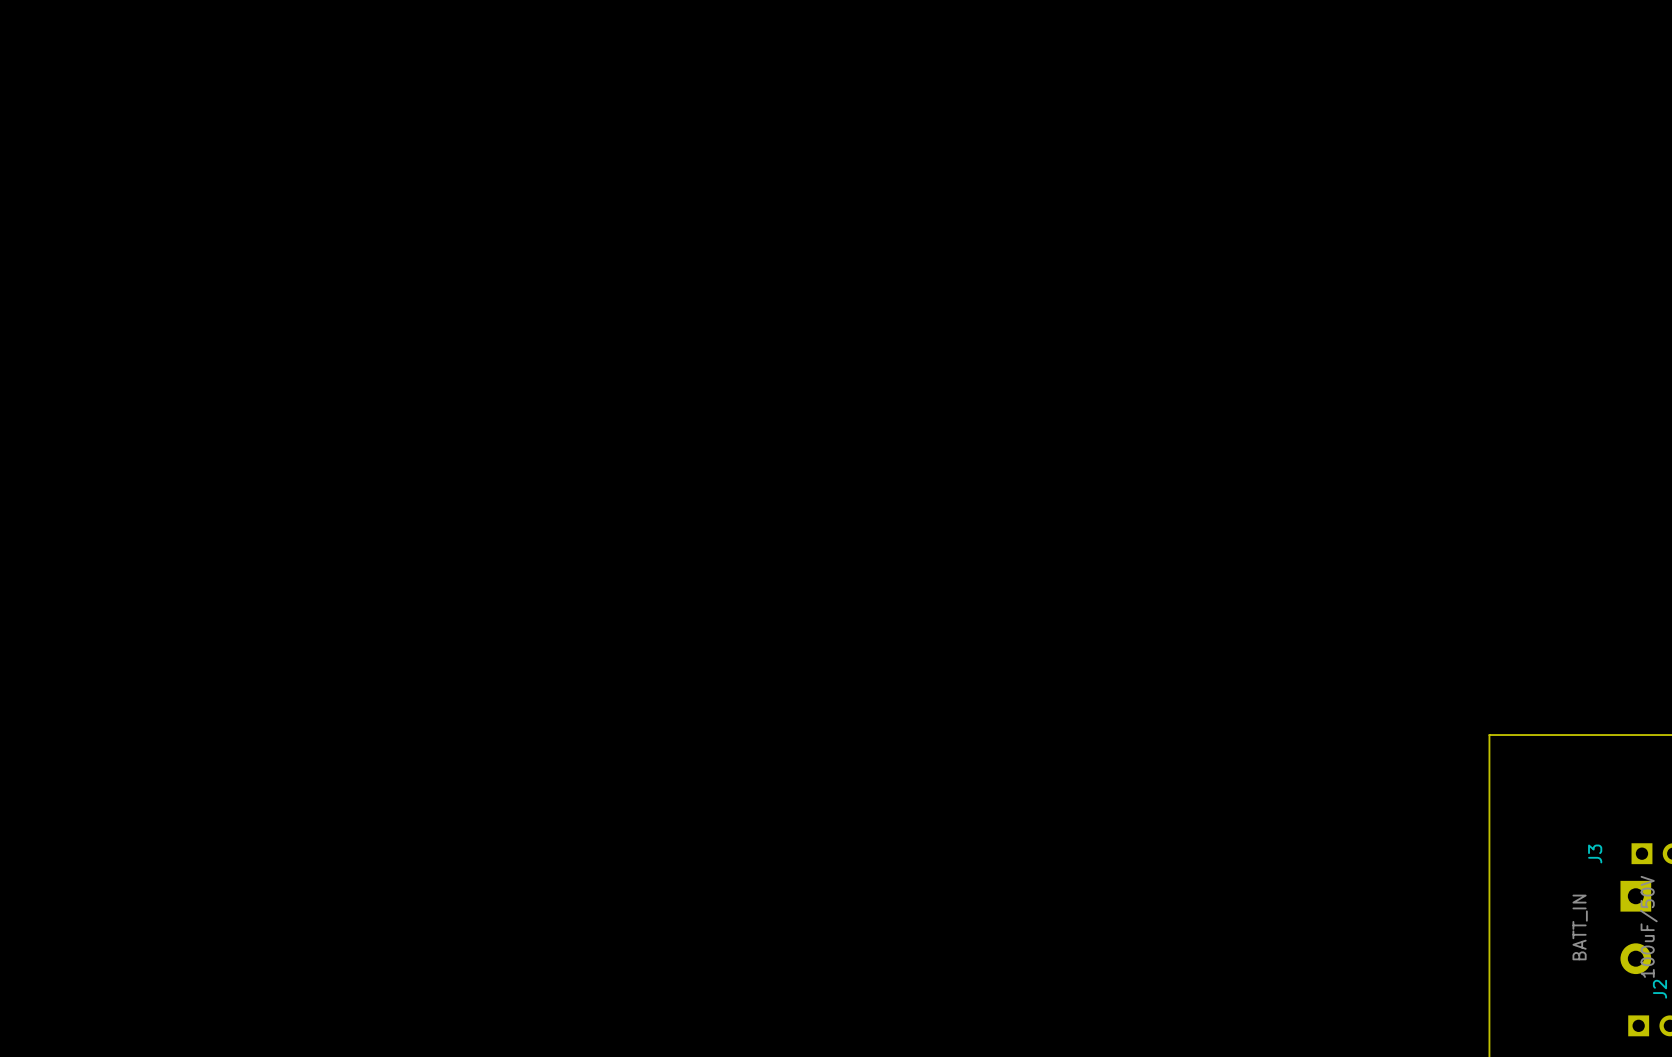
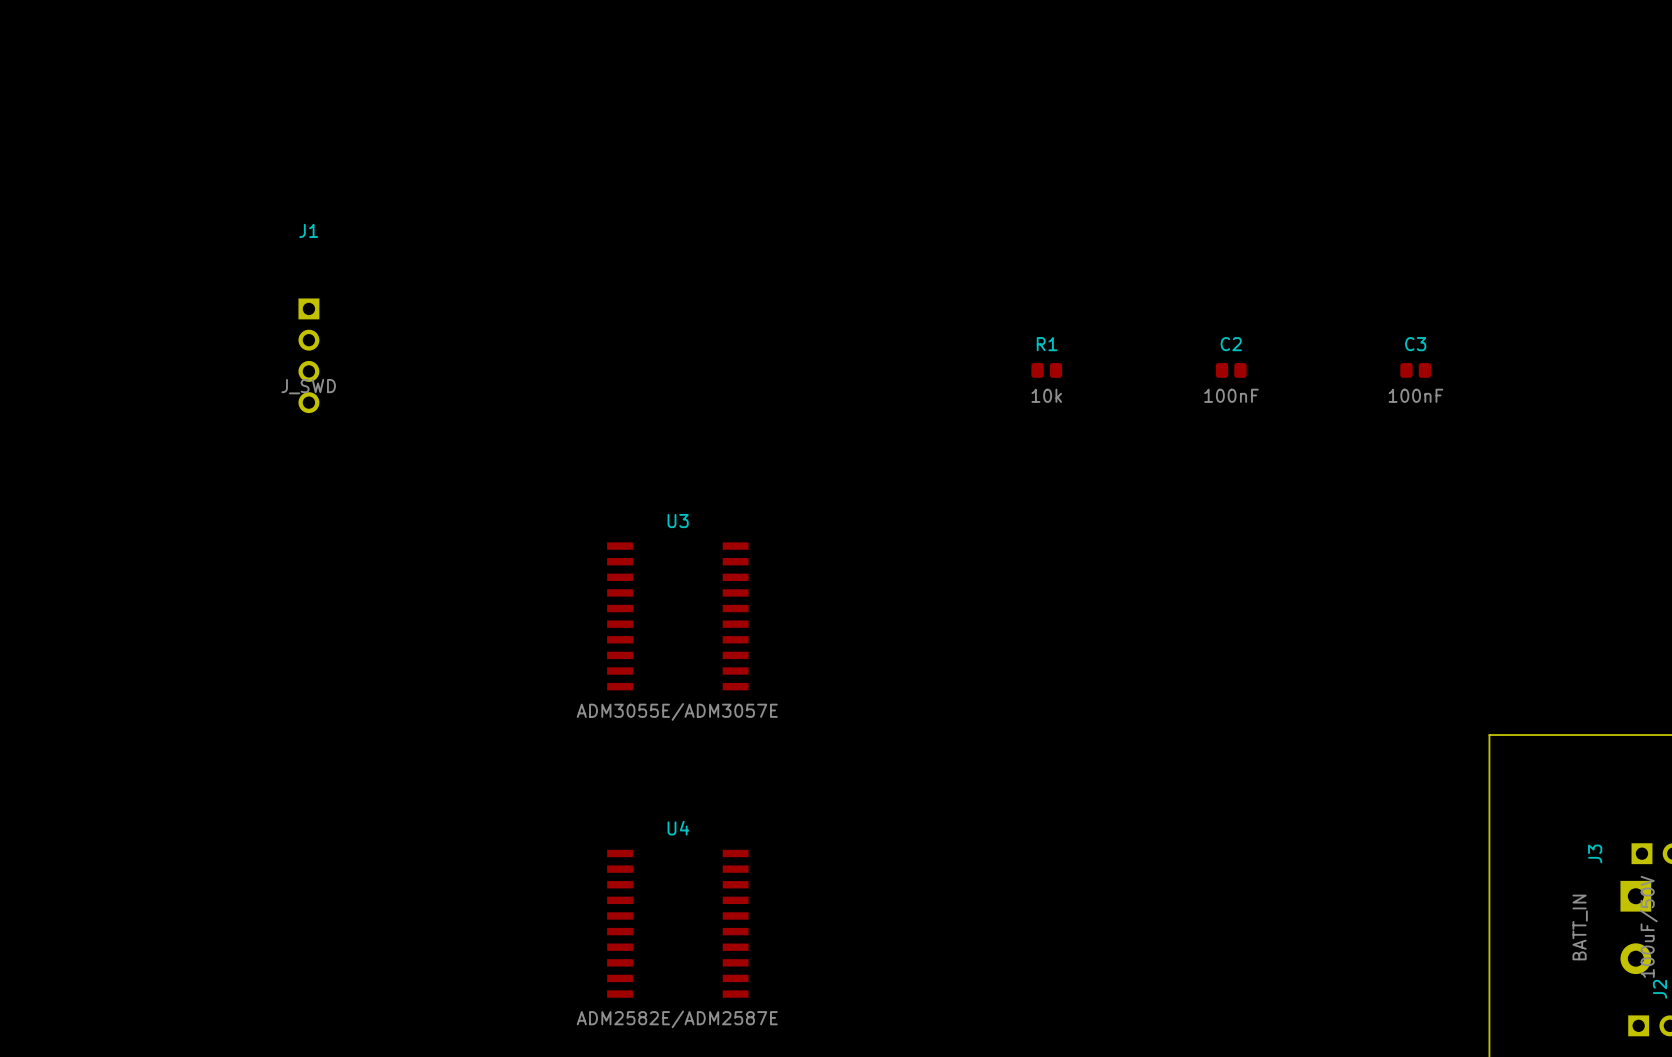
J1: none -> J_SWD (308, 355)
R1: none -> 10k (1046, 370)
C2: none -> 100nF (1231, 370)
C3: none -> 100nF (1415, 370)
U3: none -> ADM3055E/ADM3057E (677, 616)
U4: none -> ADM2582E/ADM2587E (677, 923)

